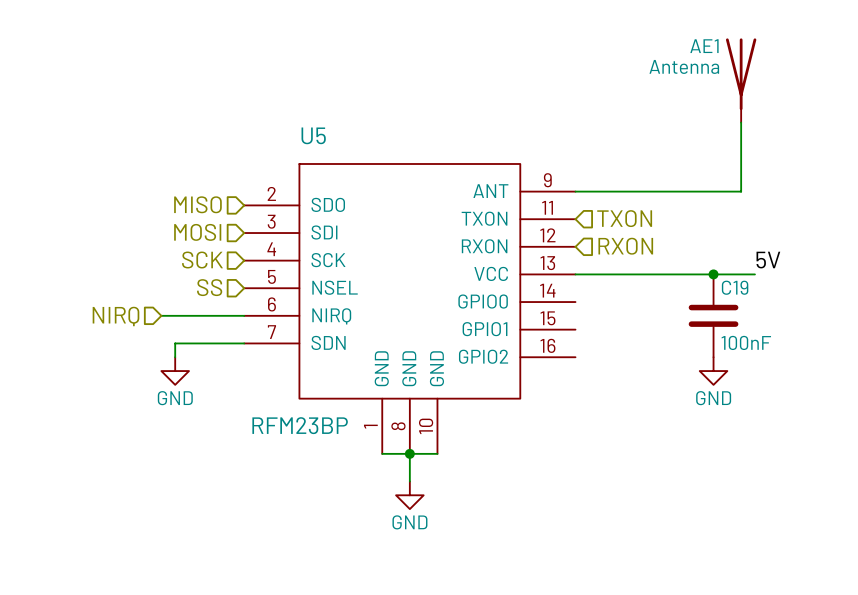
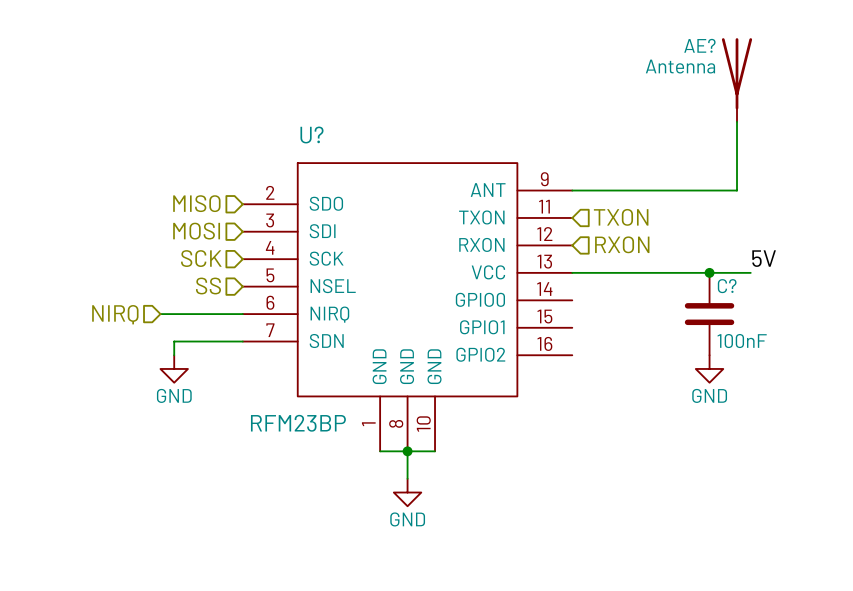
AE1 name: AE1 (704, 46) -> AE? (699, 45)
U5 name: U5 (313, 135) -> U? (311, 134)
C19 name: C19 (735, 287) -> C? (727, 286)

